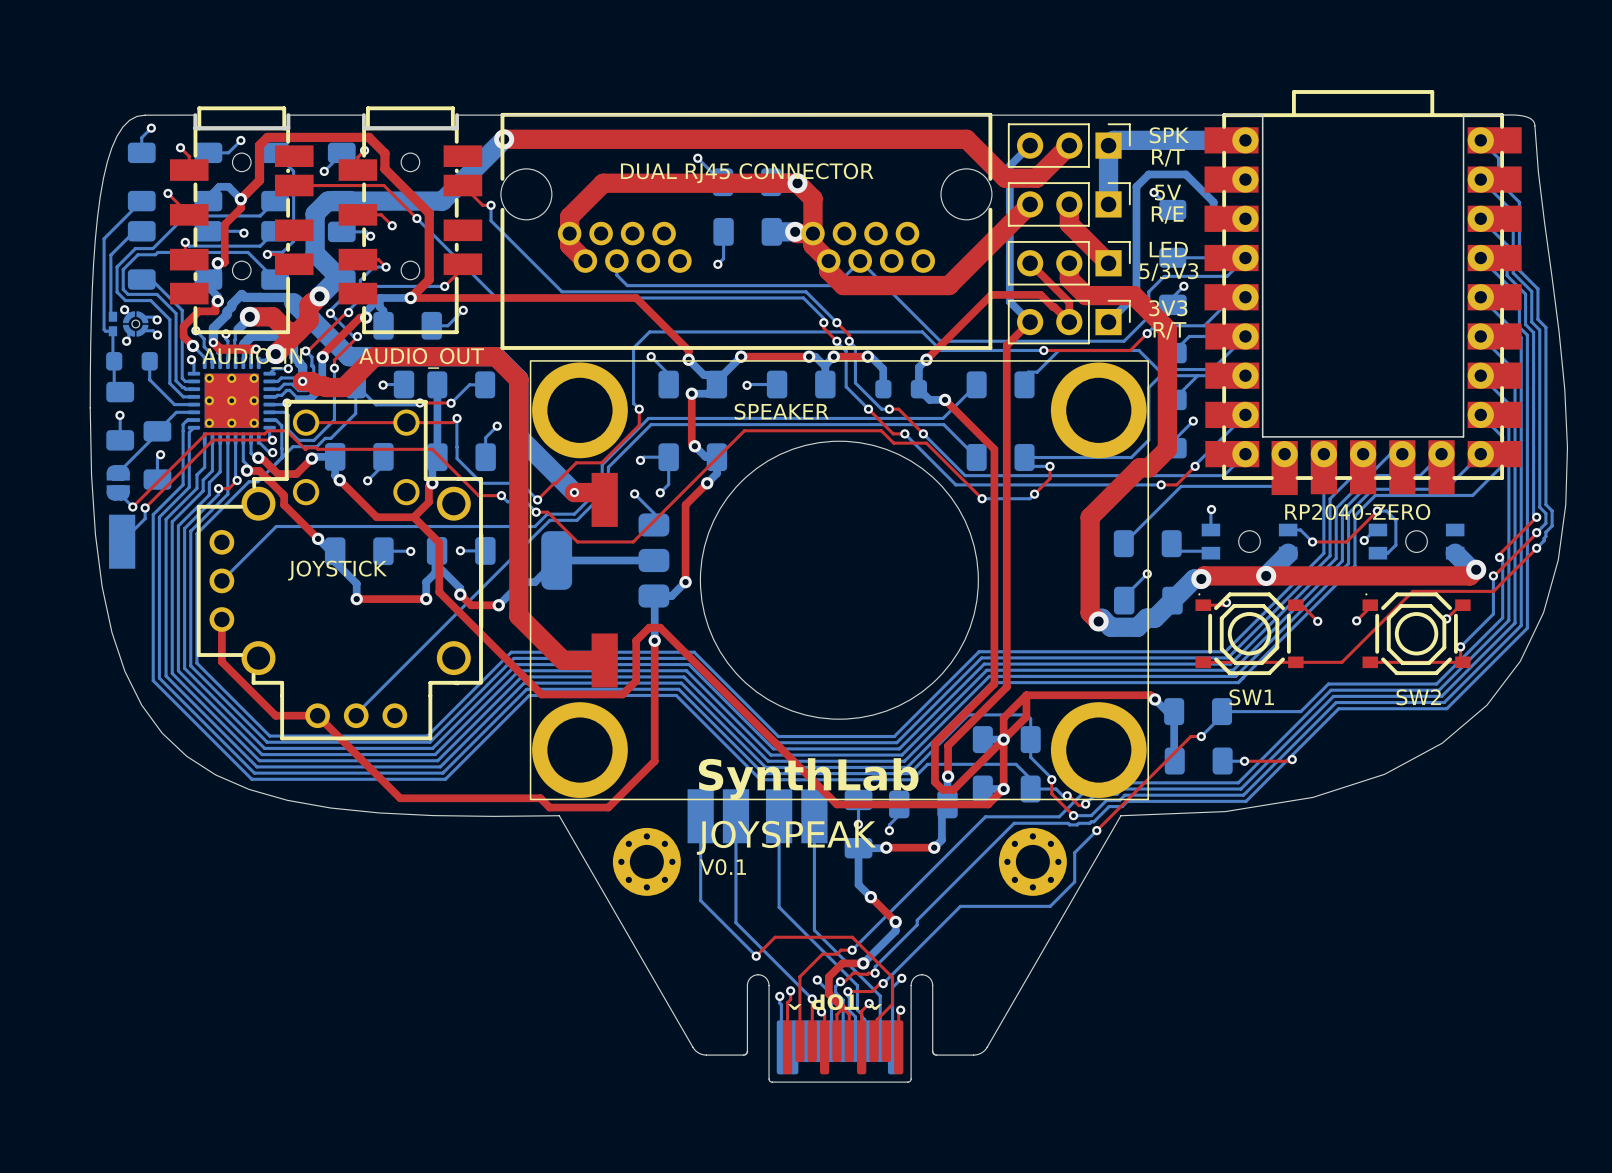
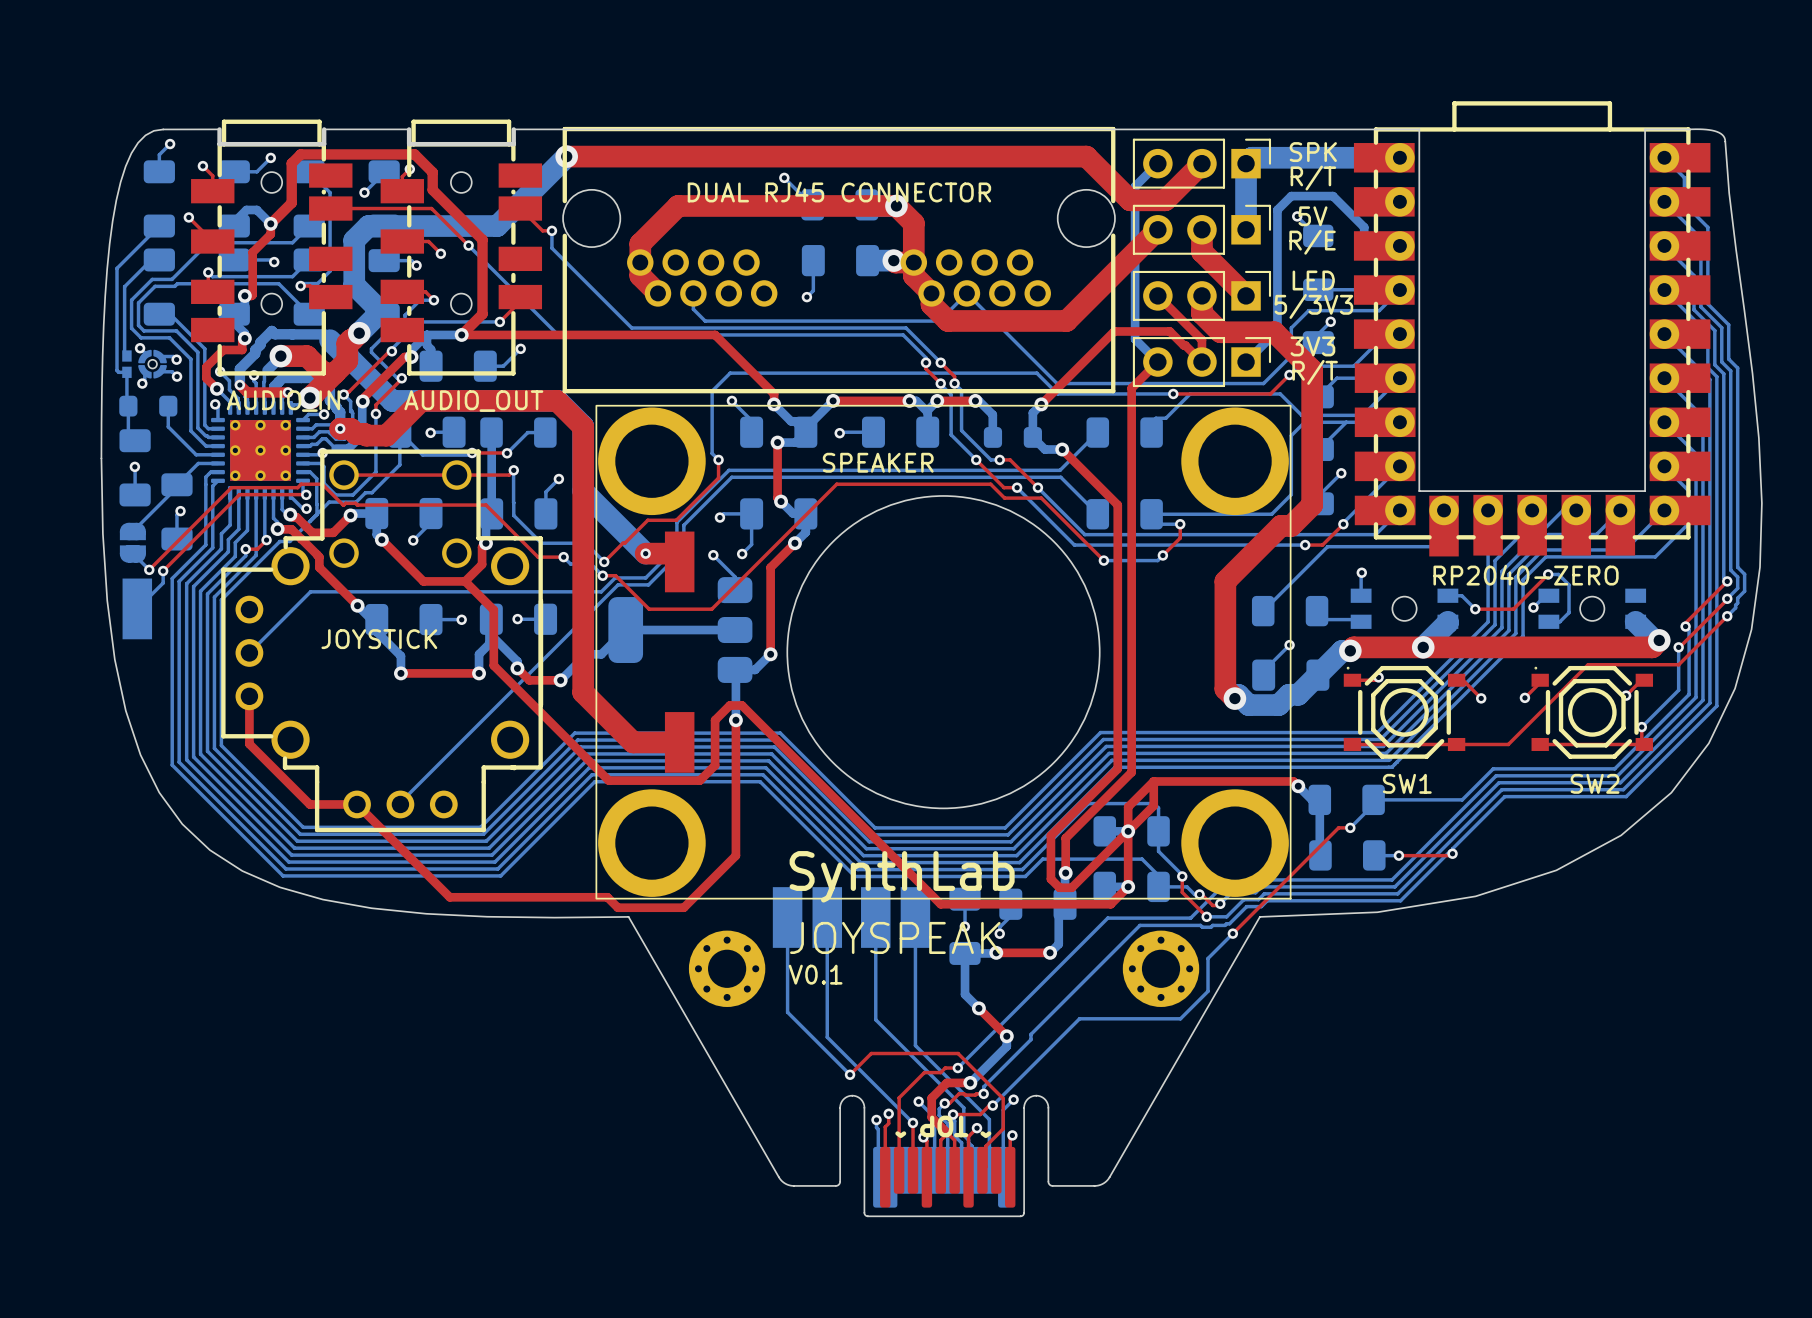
via: (330, 313) -> none

